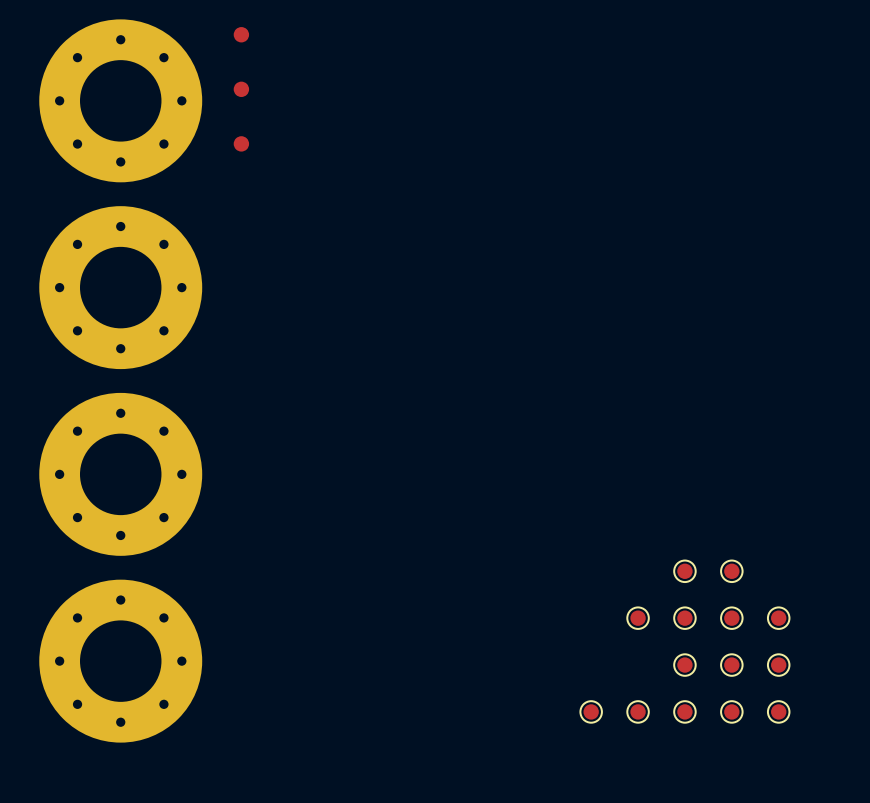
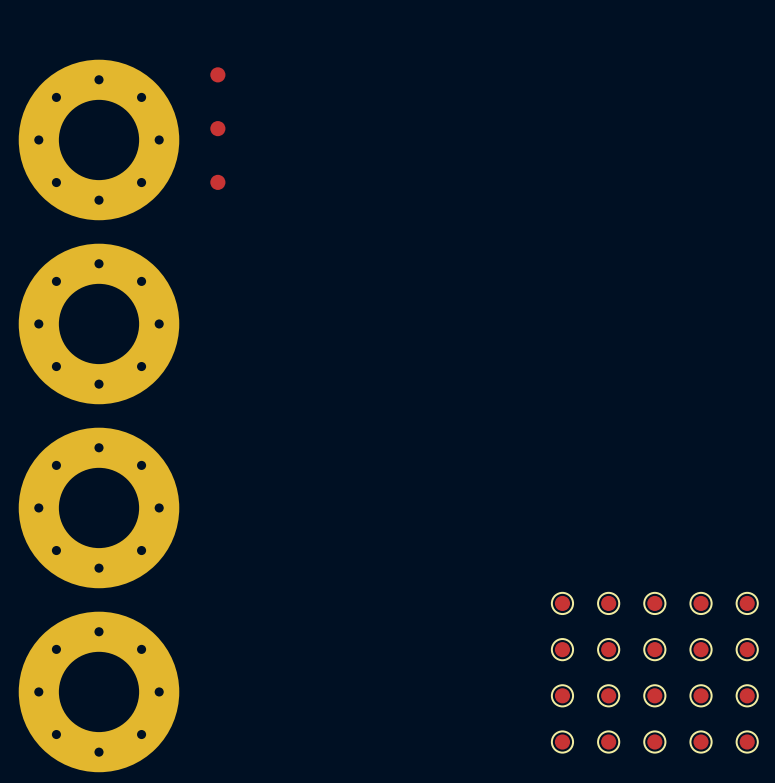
part: none -> (562, 603)
part: none -> (608, 603)
part: none -> (747, 603)
part: none -> (562, 649)
part: none -> (562, 695)
part: none -> (608, 695)

